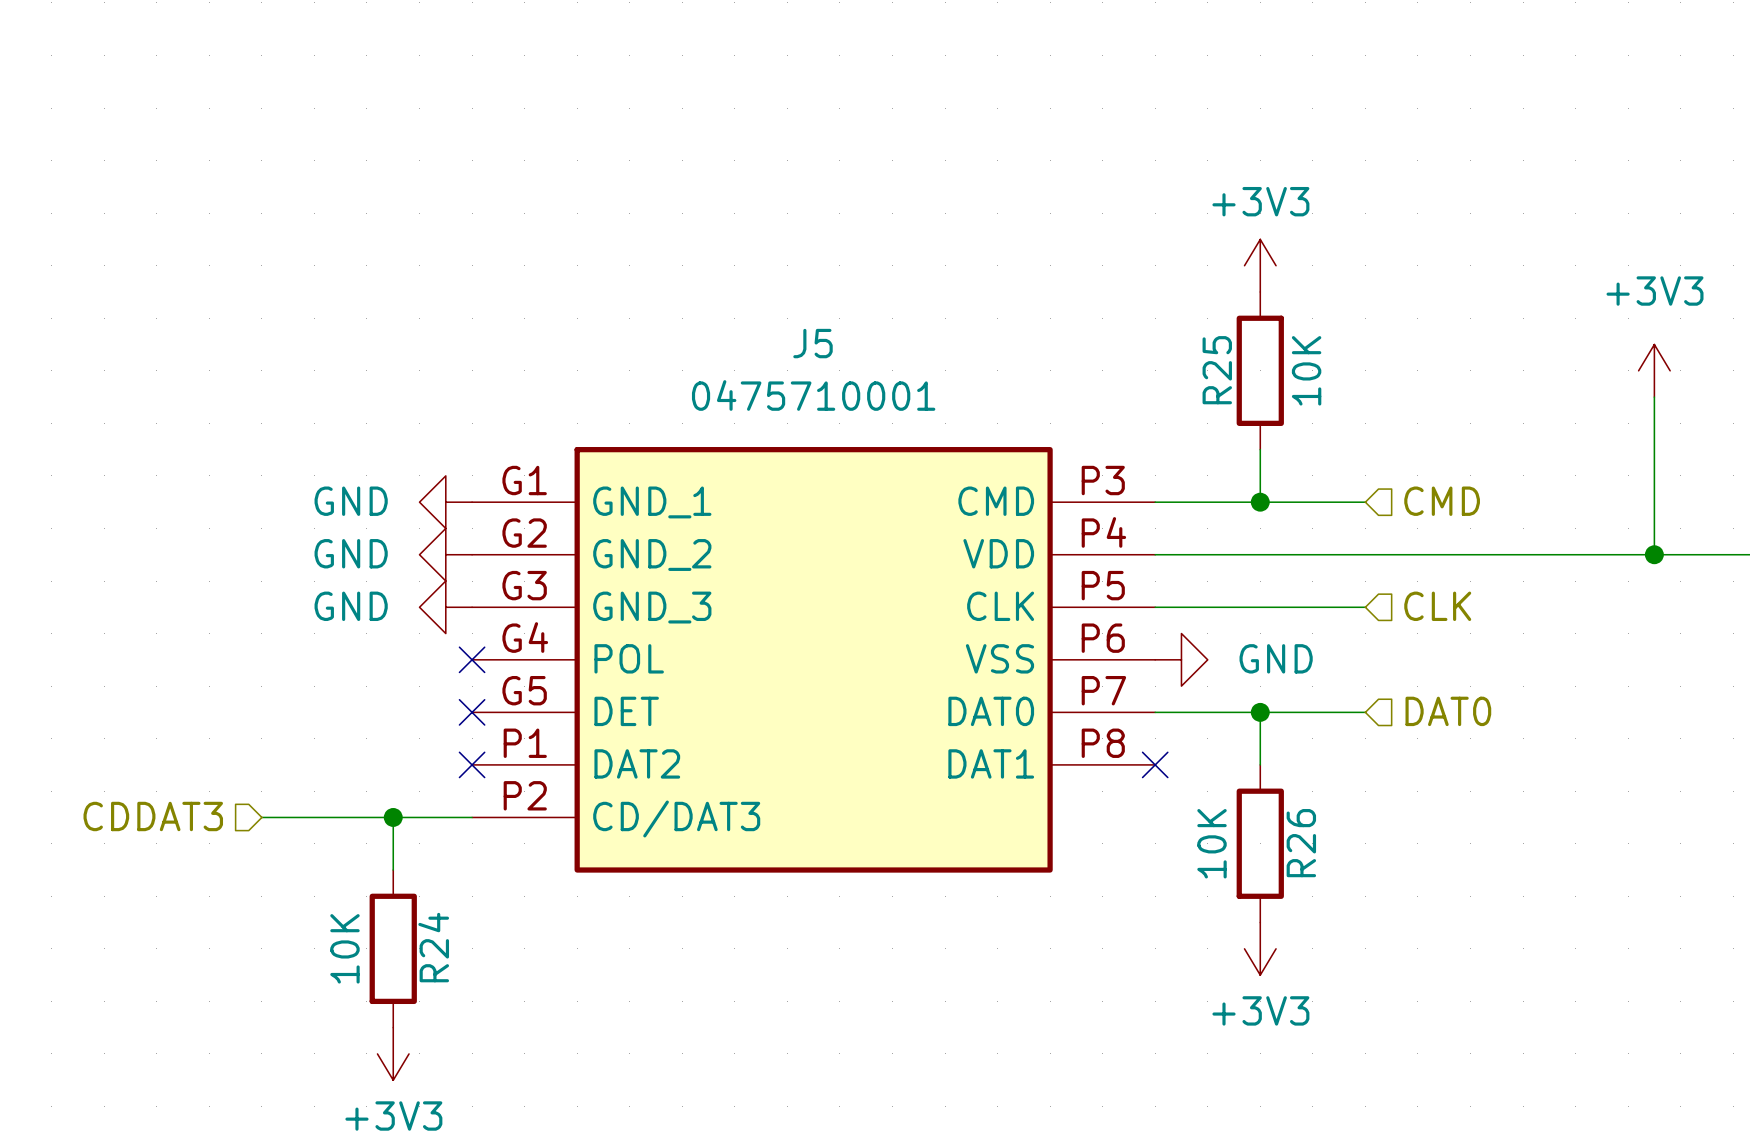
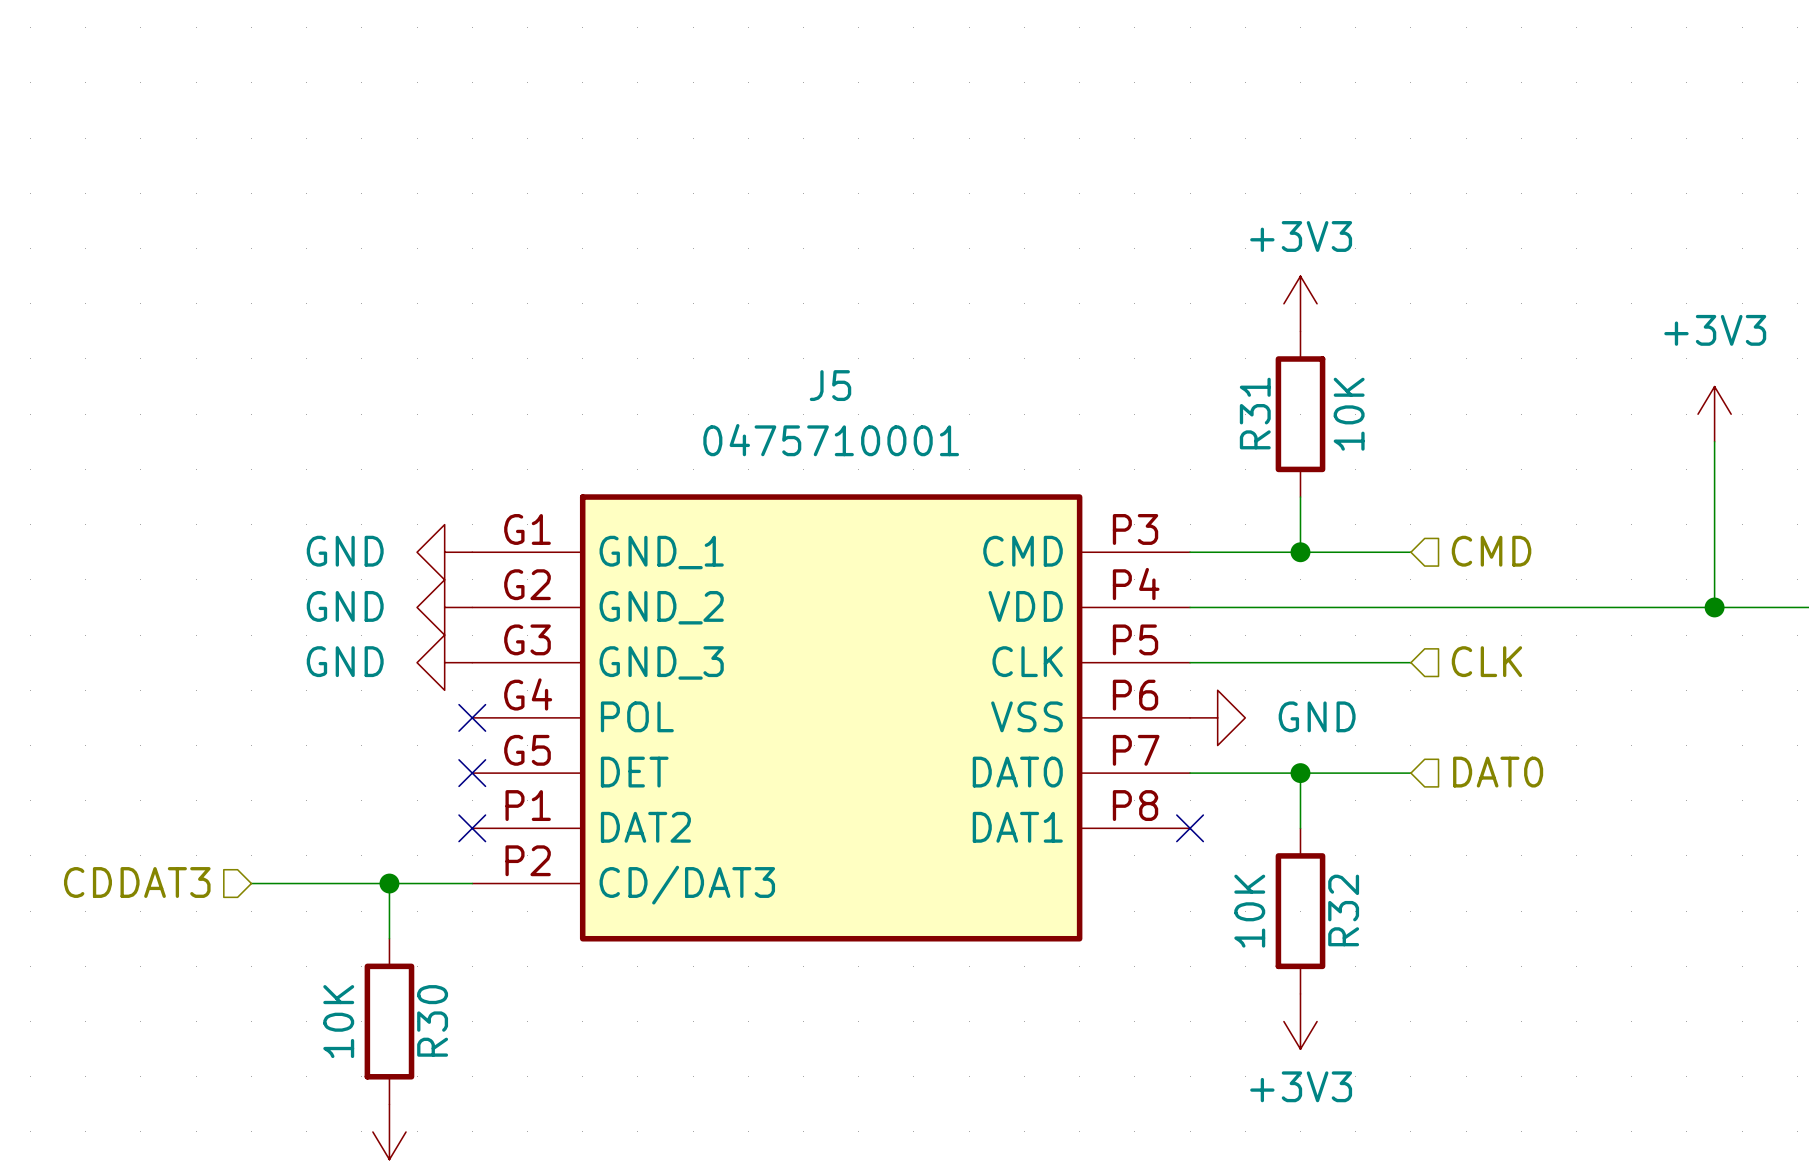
R25 name: R25 (1217, 370) -> R31 (1255, 413)
R26 name: R26 (1301, 843) -> R32 (1343, 910)
R24 name: R24 (433, 947) -> R30 (432, 1020)

